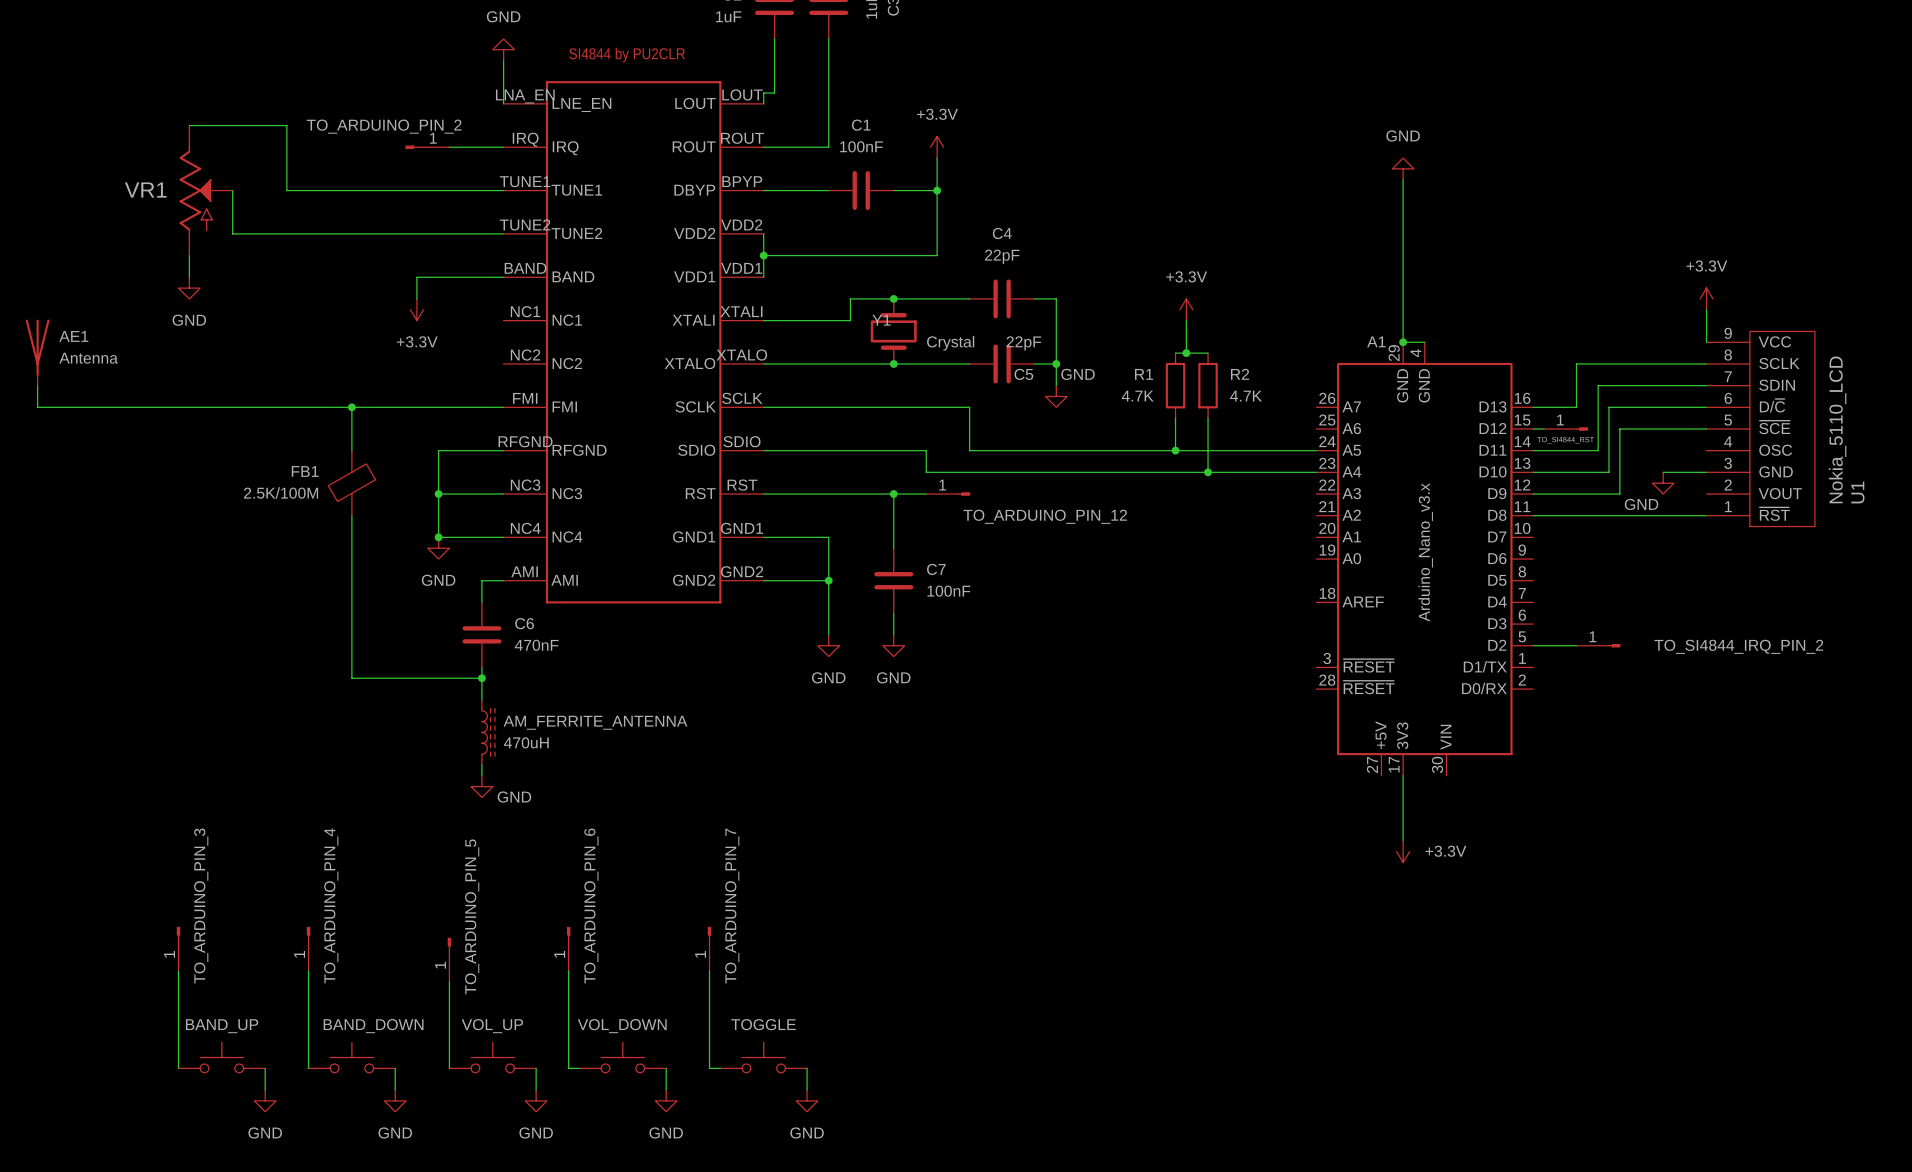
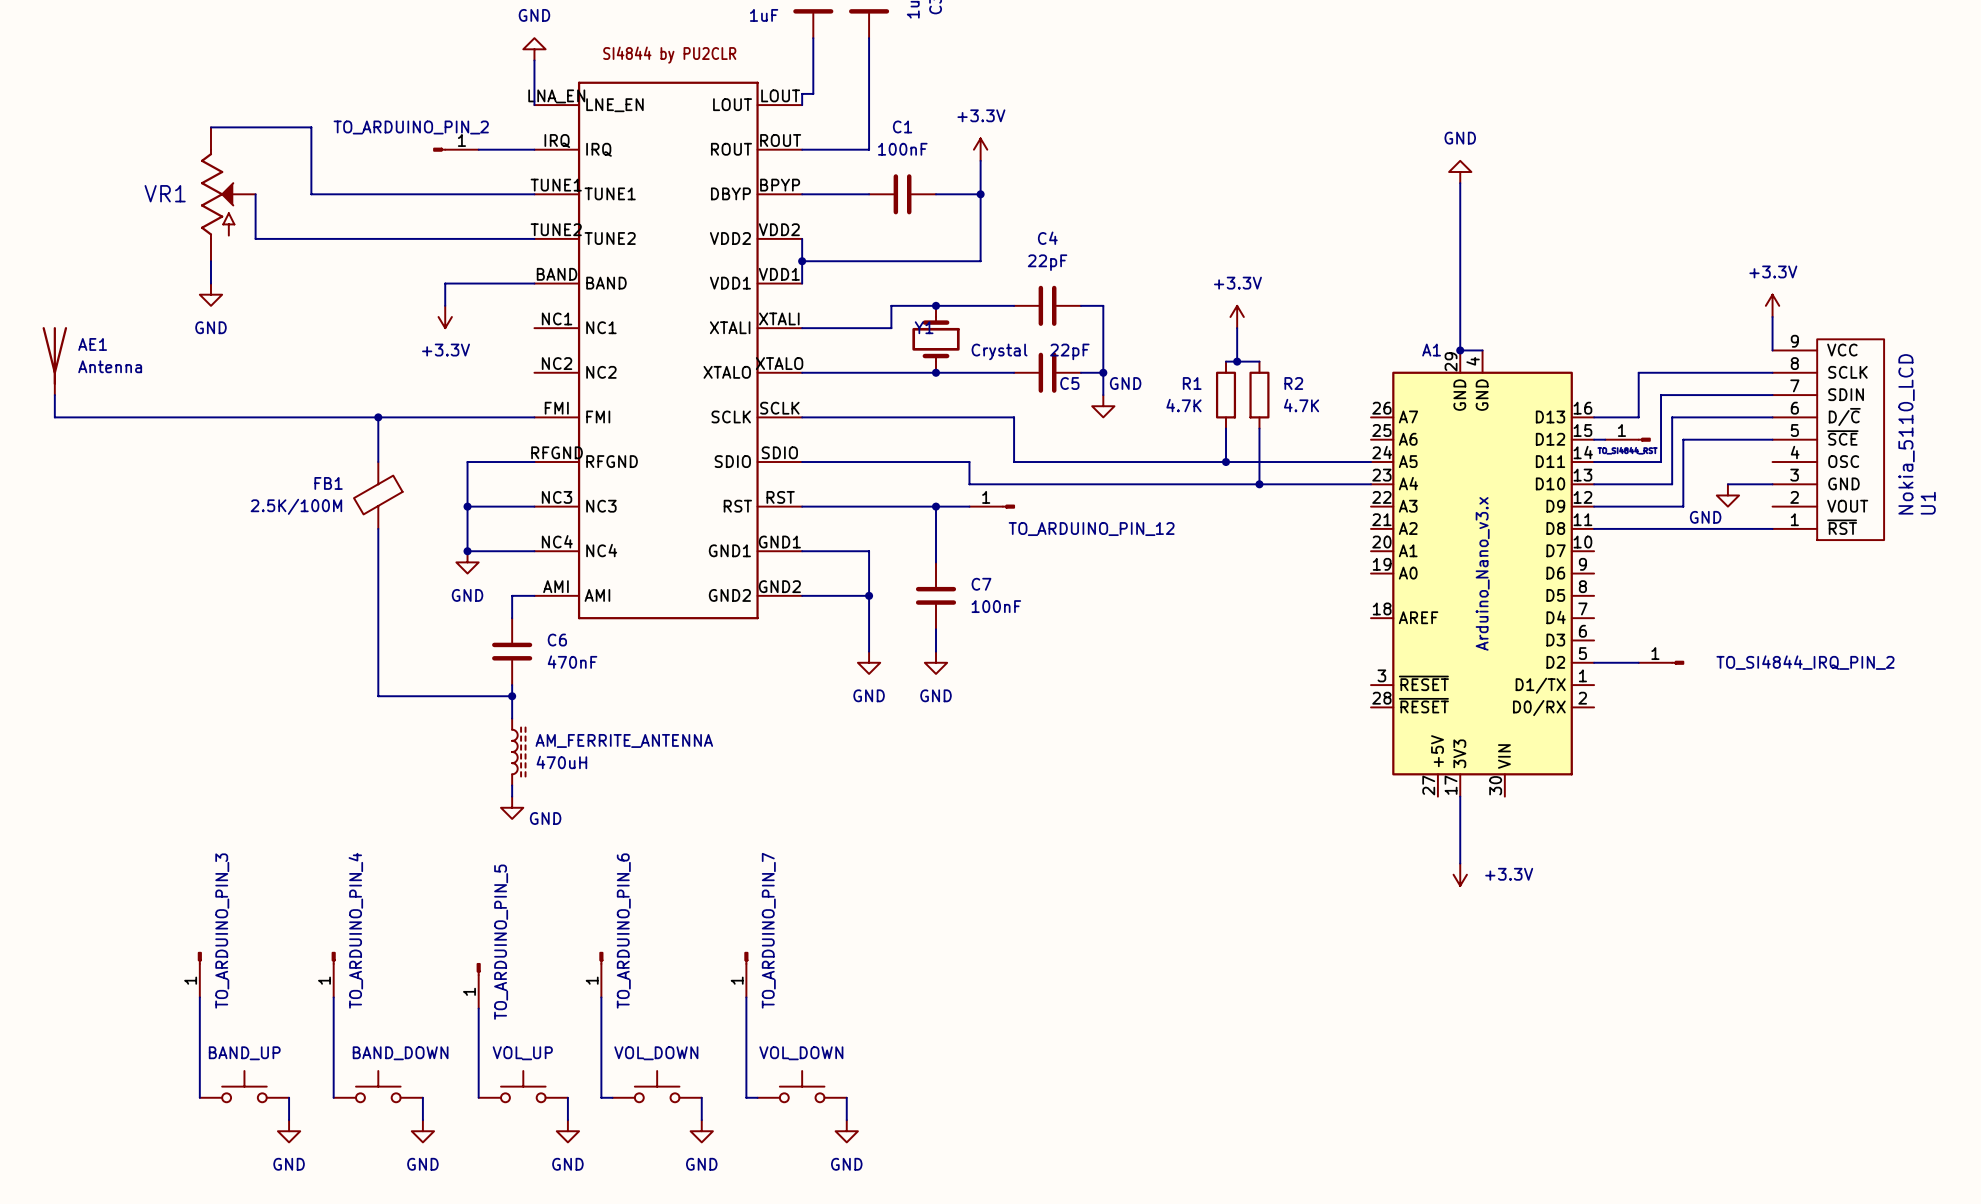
part value: TOGGLE (763, 1024) -> VOL_DOWN (801, 1053)

